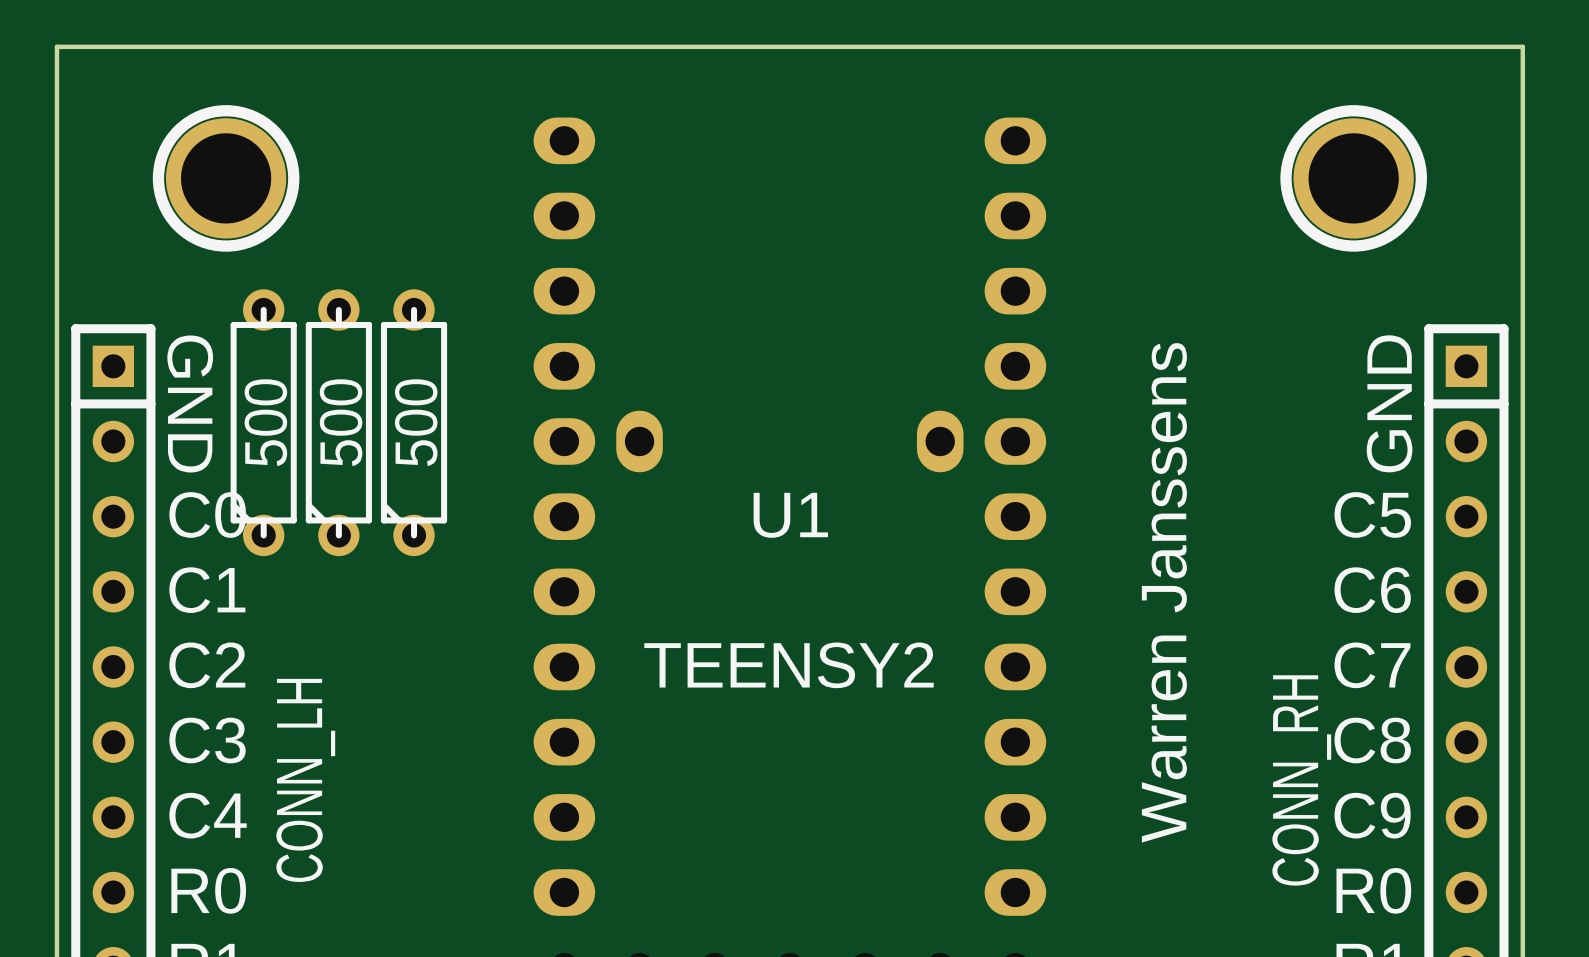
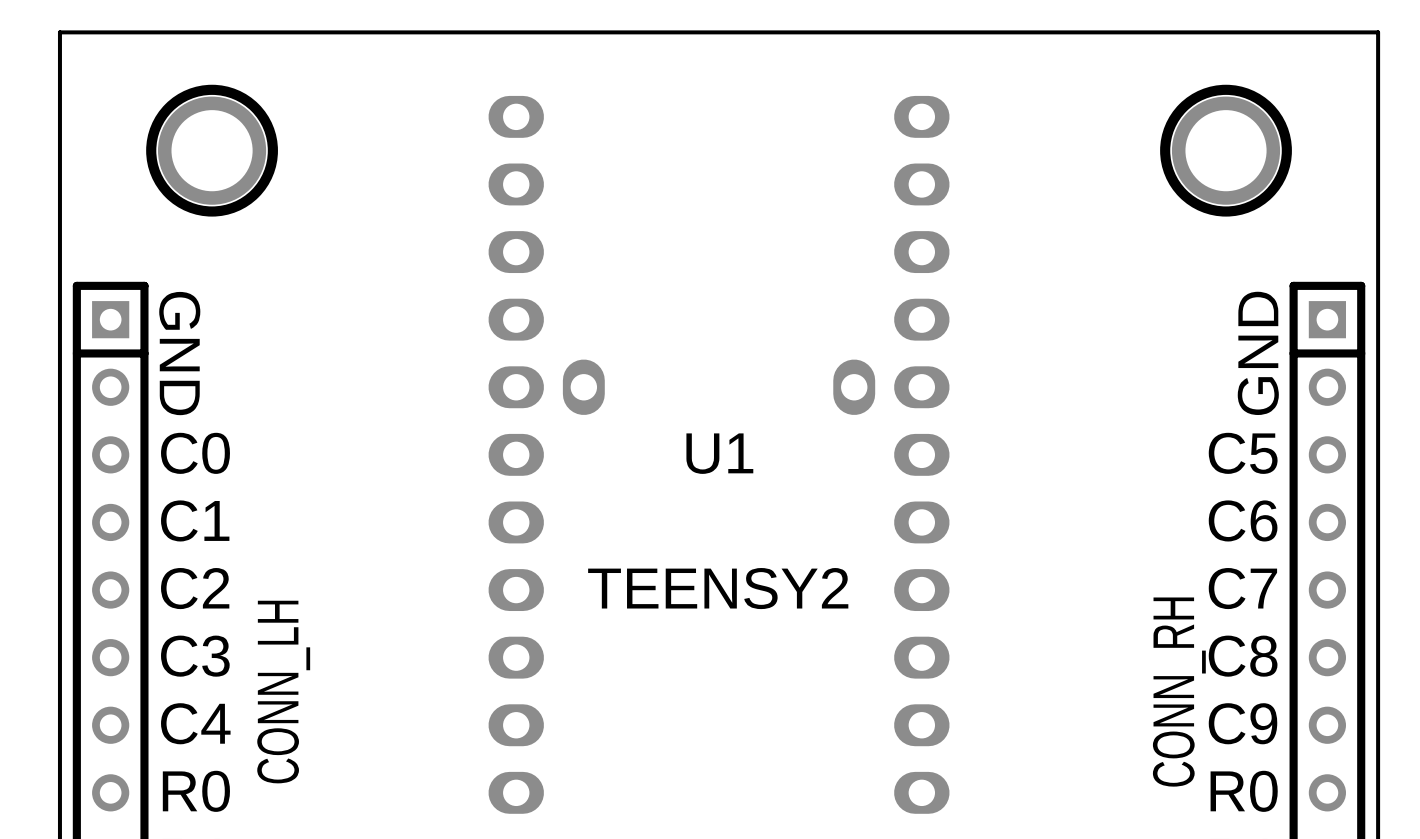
part: 500 (263, 422) -> none
part: 500 (338, 422) -> none
part: 500 (414, 422) -> none
text: Warren Janssens (1164, 592) -> none

